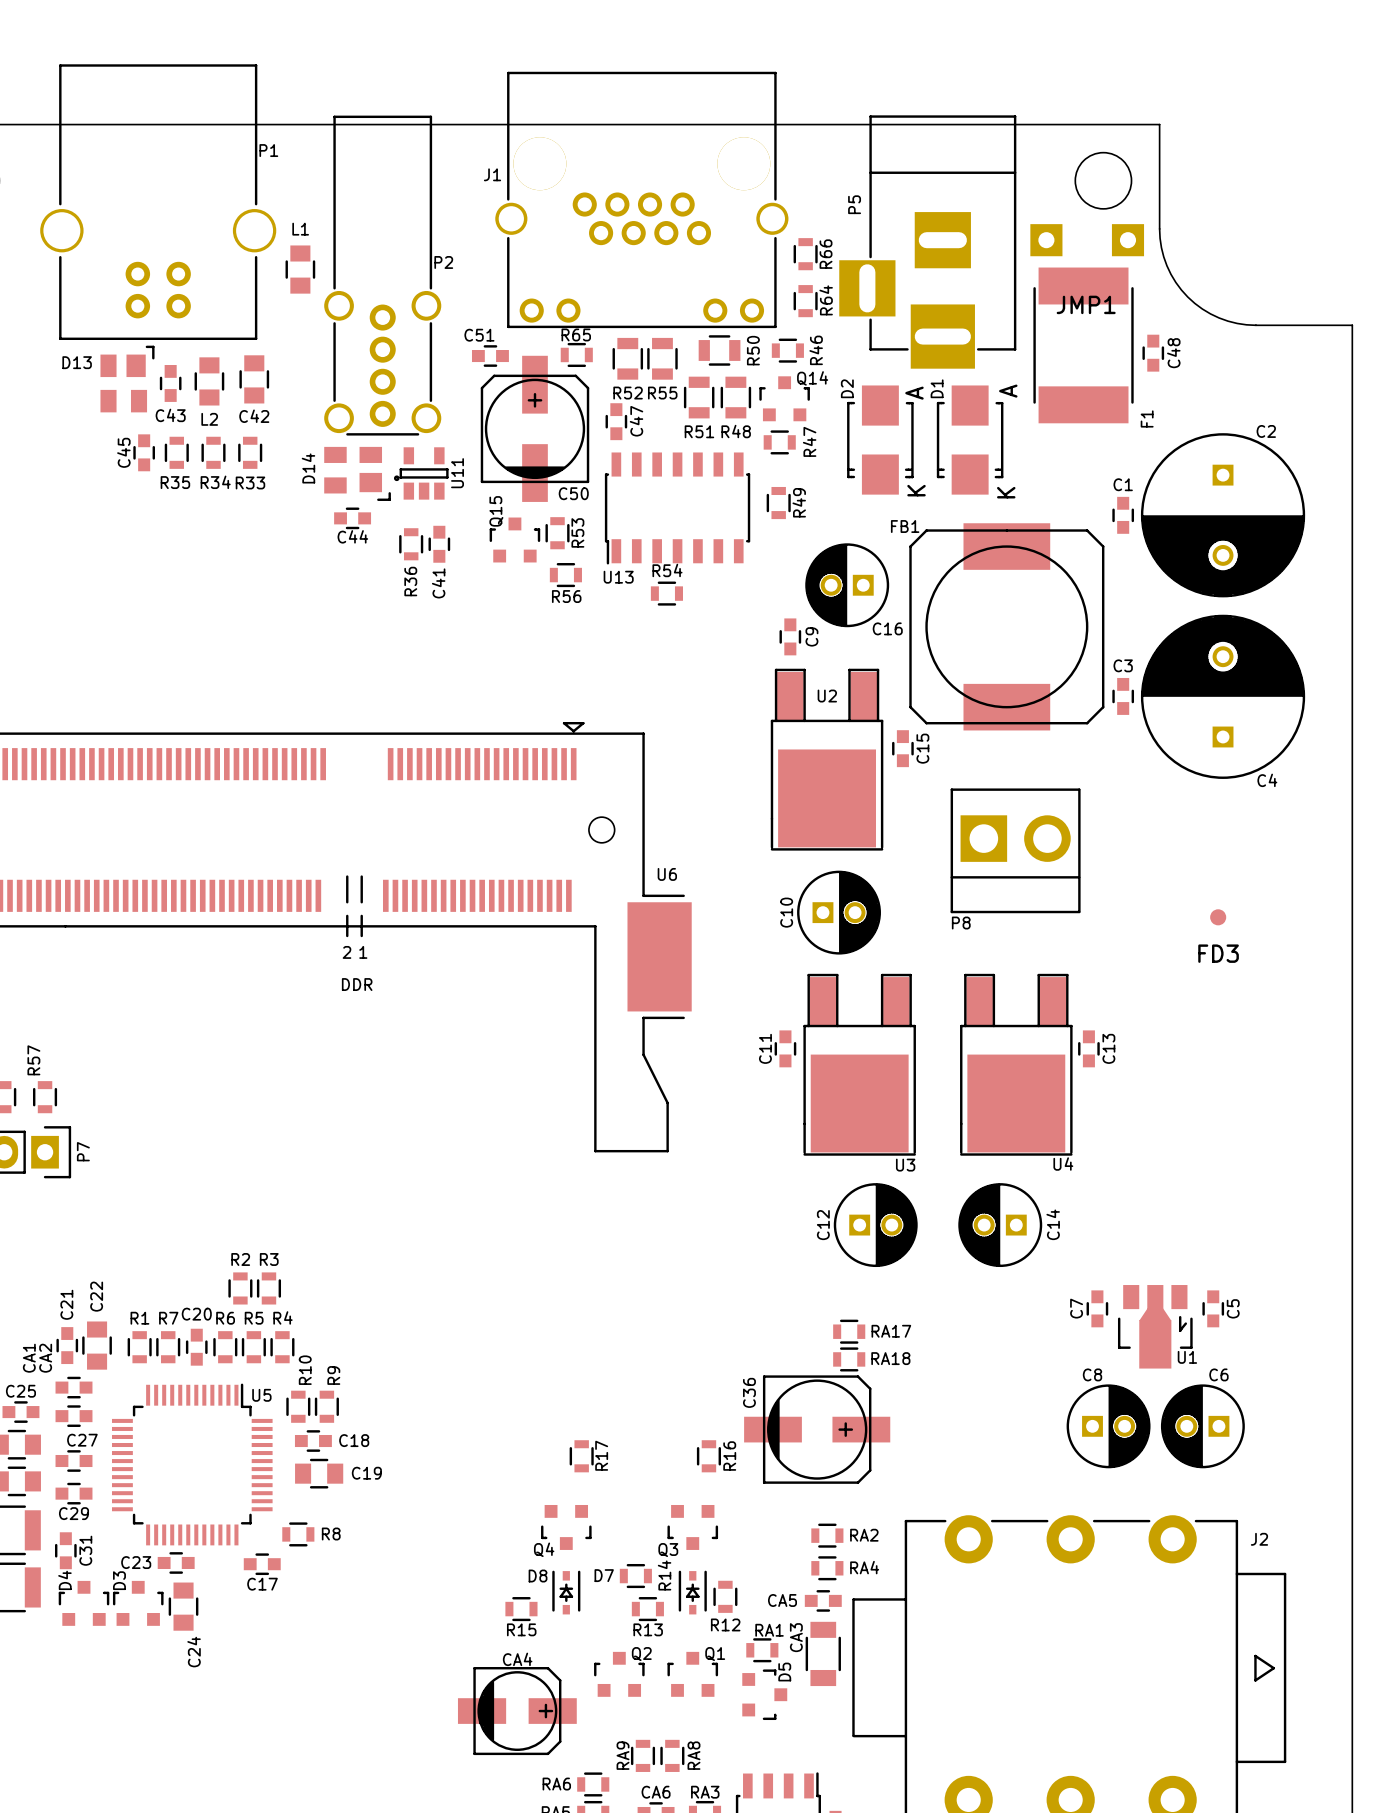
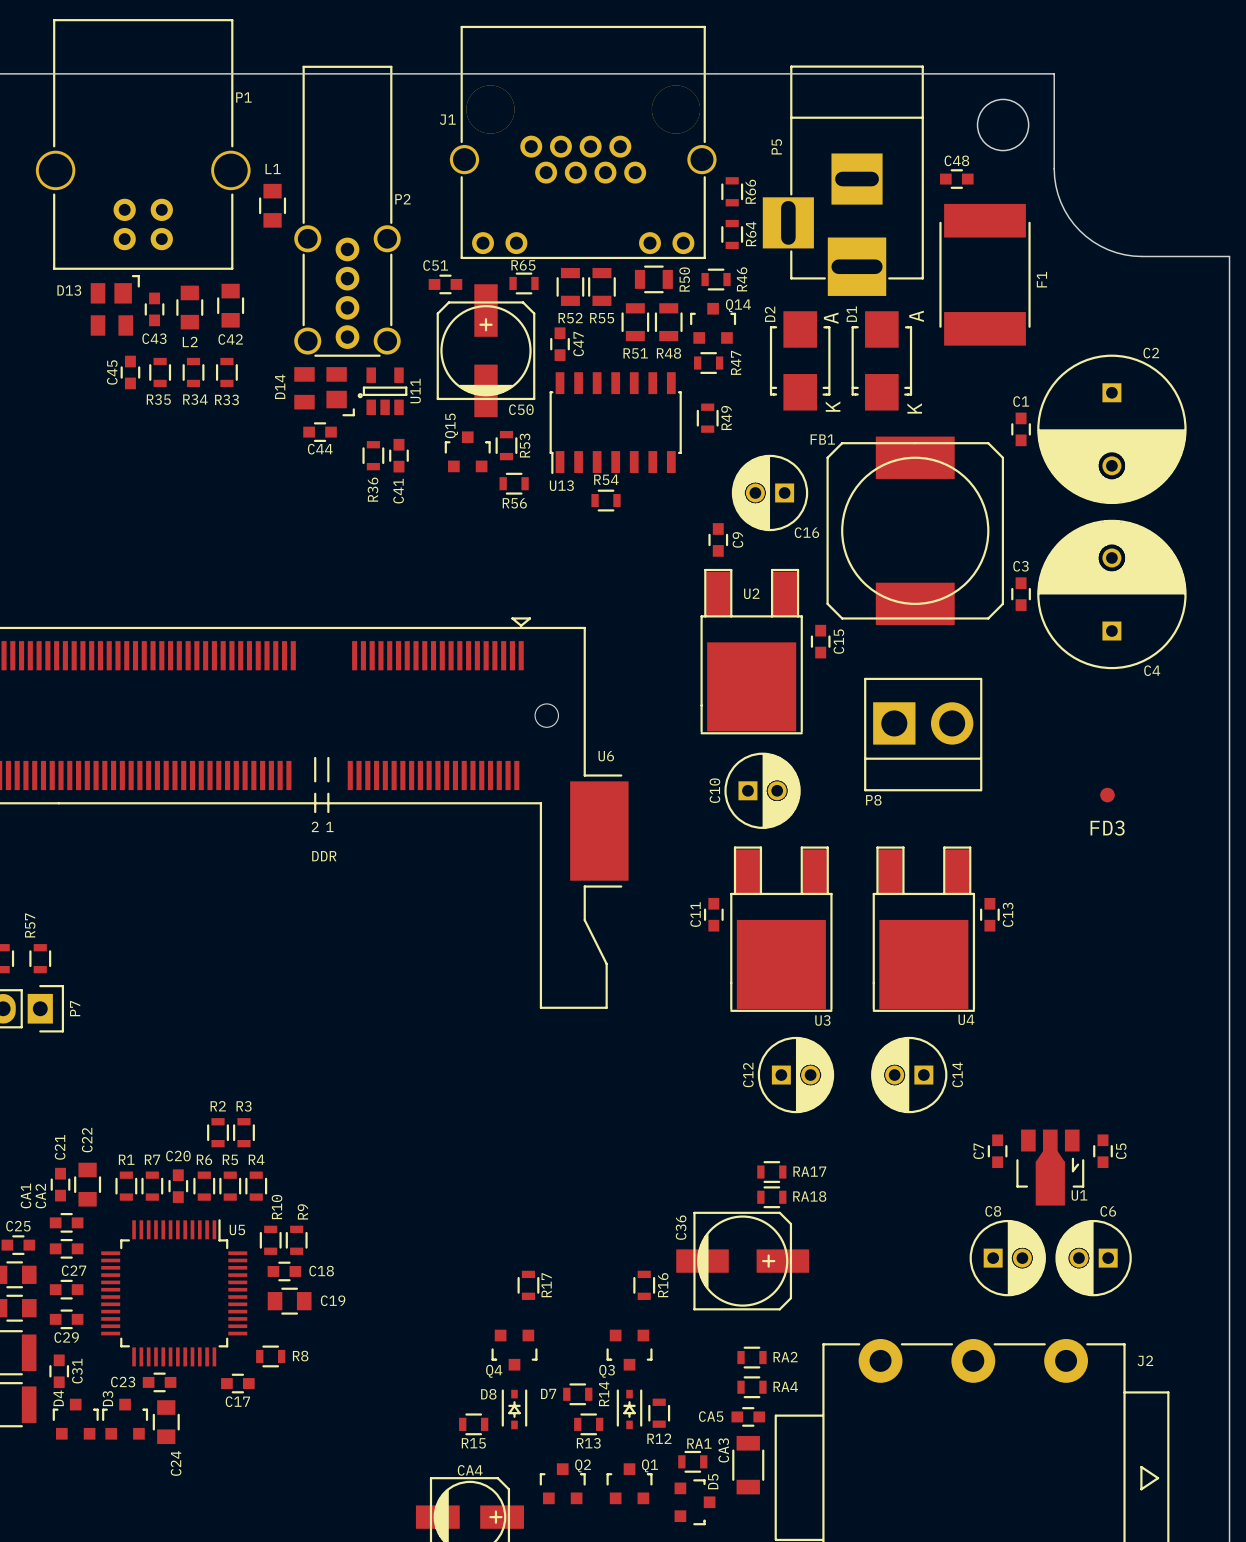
JMP1: (1087, 240) -> none
C48 rotation: 0° (1153, 353) -> 90° clockwise (956, 179)
C48 position: (1153, 353) -> (956, 179)
F1 name position: F1 (1147, 418) -> F1 (1041, 279)

